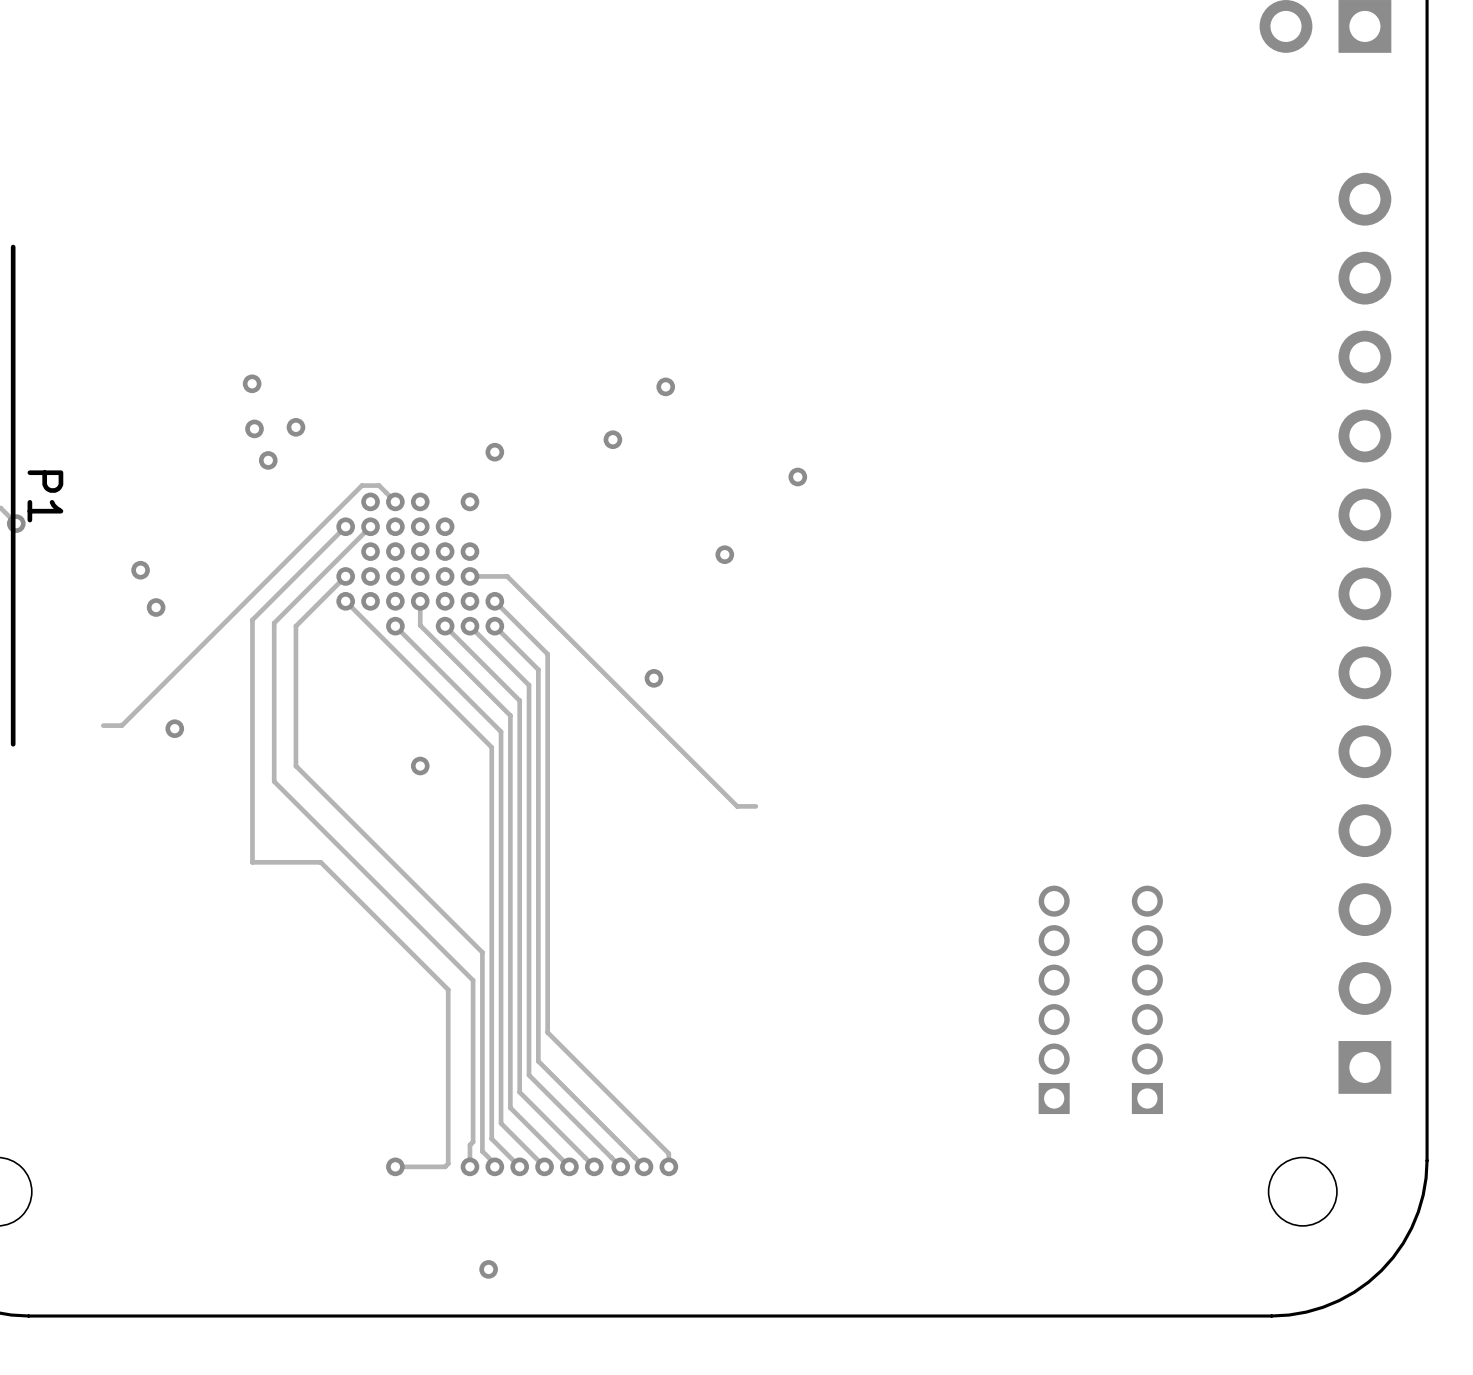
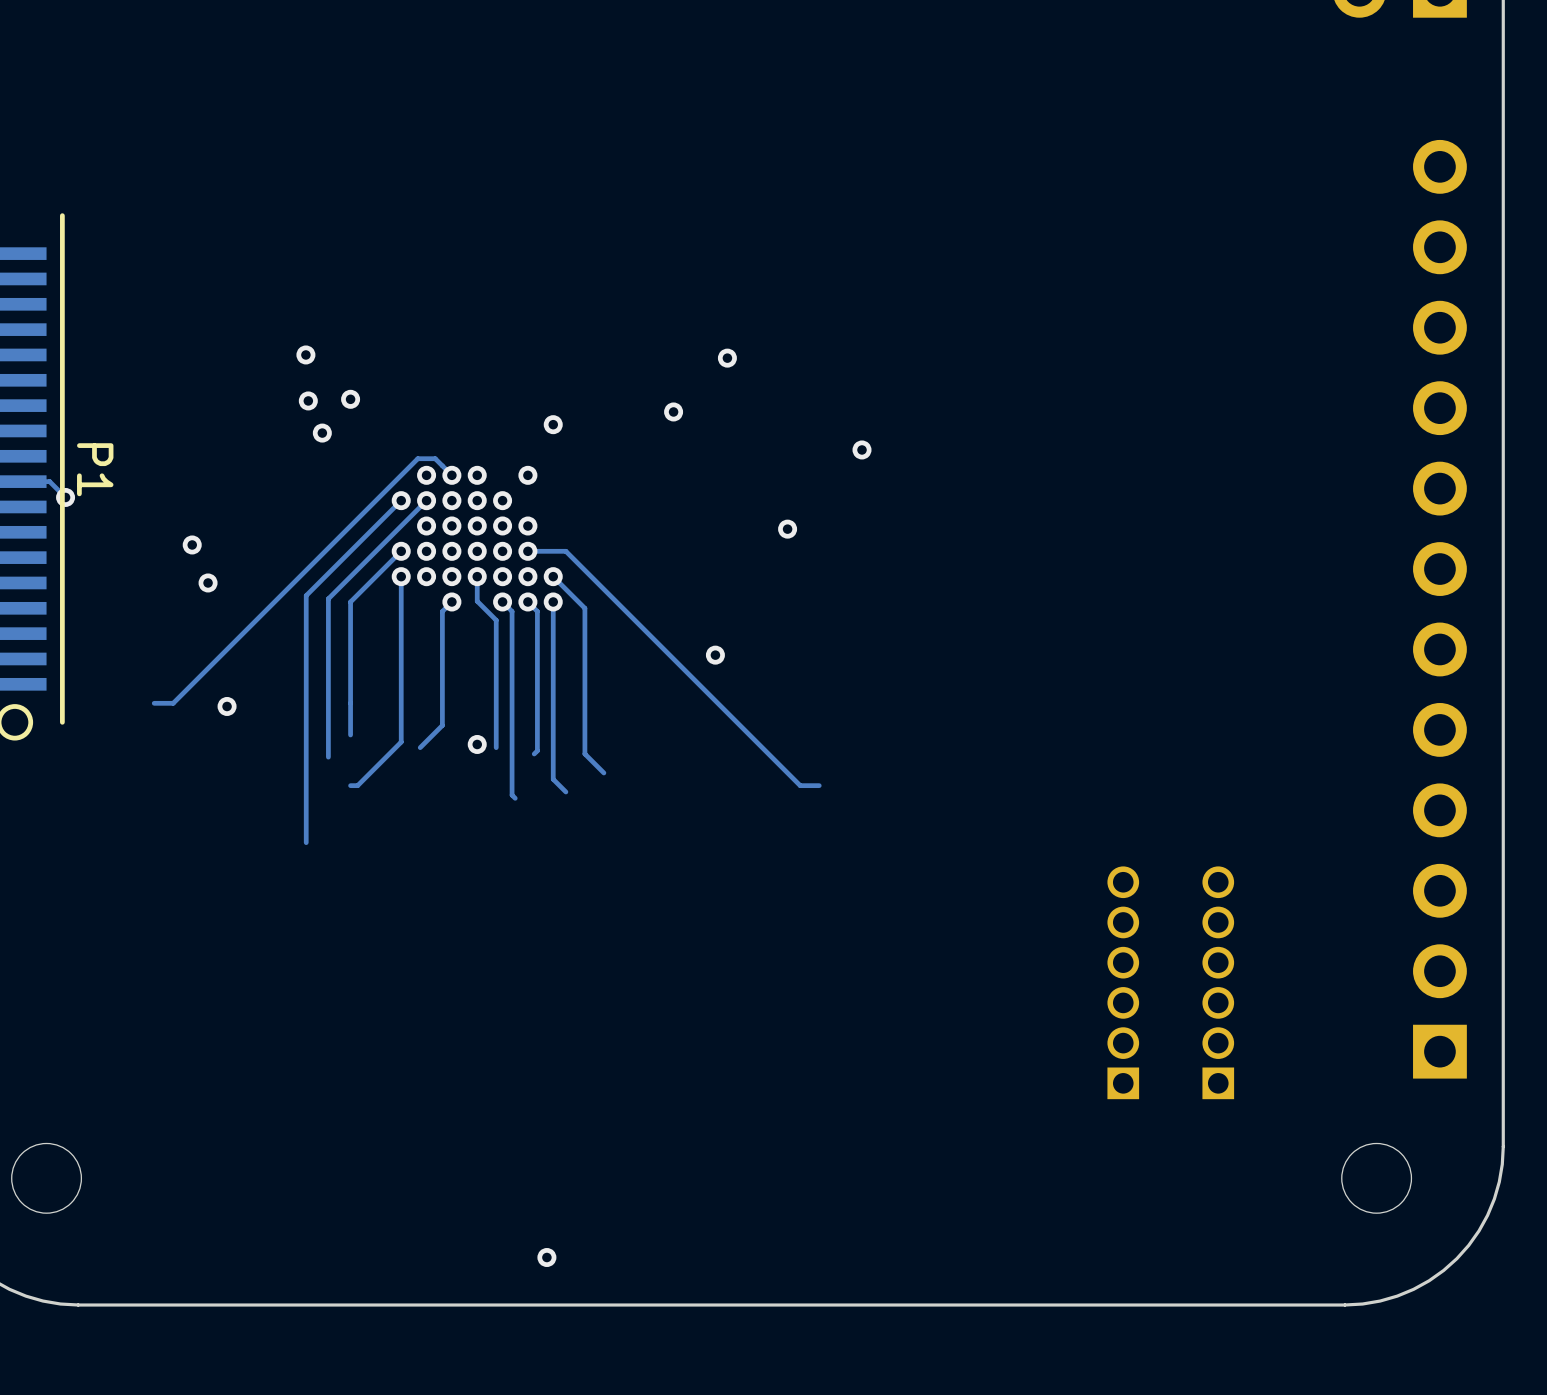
track: (345, 601) (491, 747) (491, 1138) (519, 1166) -> (401, 576) (401, 742) (357, 785) (350, 785)
track: (395, 626) (501, 731) (501, 1123) (544, 1166) -> (451, 601) (442, 611) (442, 725) (420, 747)
track: (494, 626) (538, 669) (538, 1061) (643, 1166) -> (553, 601) (553, 779) (565, 791)
track: (525, 632) (547, 654) (547, 1032) (668, 1153) (668, 1166) -> (584, 608) (584, 753) (603, 772)
track: (454, 635) (519, 700) (519, 1092) (594, 1166) -> (512, 611) (512, 795) (515, 798)
track: (479, 635) (529, 685) (529, 1075) (620, 1166) -> (537, 611) (537, 750) (534, 753)
track: (438, 644) (510, 715) (510, 1107) (569, 1166) -> (496, 620) (496, 747)
track: (295, 756) (295, 766) (482, 952) (482, 1151) (491, 1160) -> none
track: (274, 778) (274, 781) (473, 980) (473, 1142) (469, 1145) (469, 1166) -> none
track: (252, 862) (320, 862) (448, 989) (448, 1163) (445, 1166) (395, 1166) -> none
via: (395, 1166) -> none
via: (469, 1166) -> none
via: (494, 1166) -> none
via: (519, 1166) -> none
via: (544, 1166) -> none
via: (569, 1166) -> none
via: (594, 1166) -> none
via: (620, 1166) -> none
via: (643, 1166) -> none
via: (668, 1166) -> none

